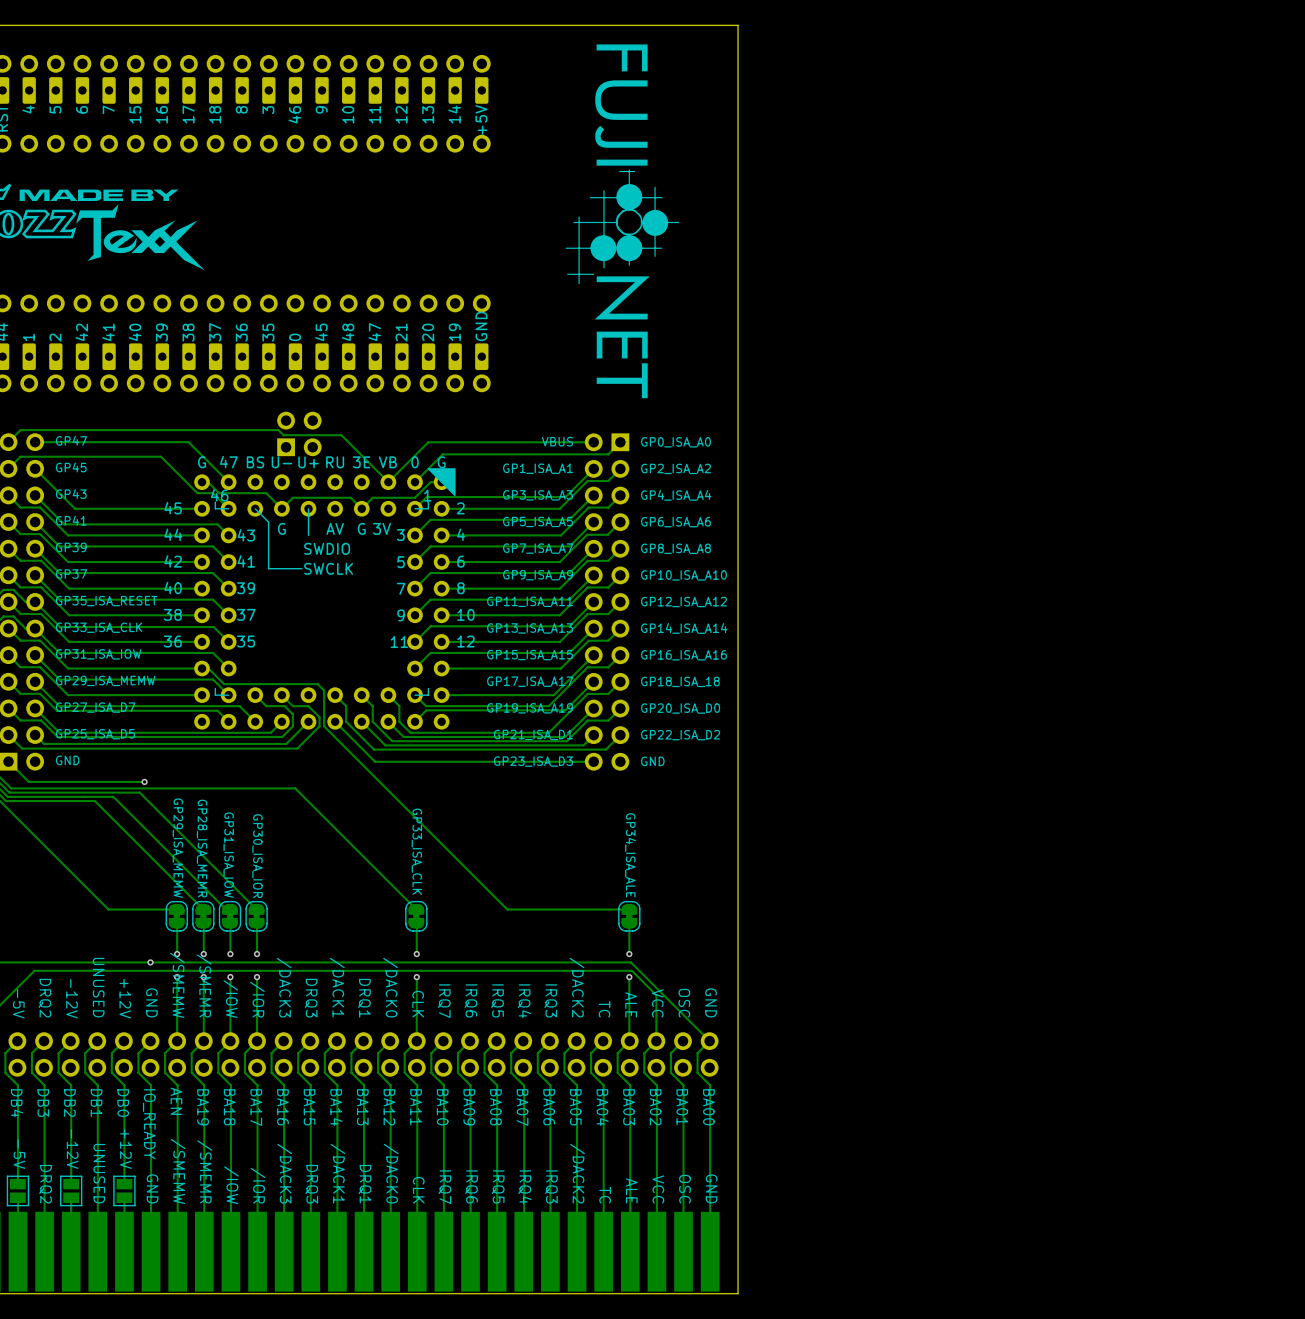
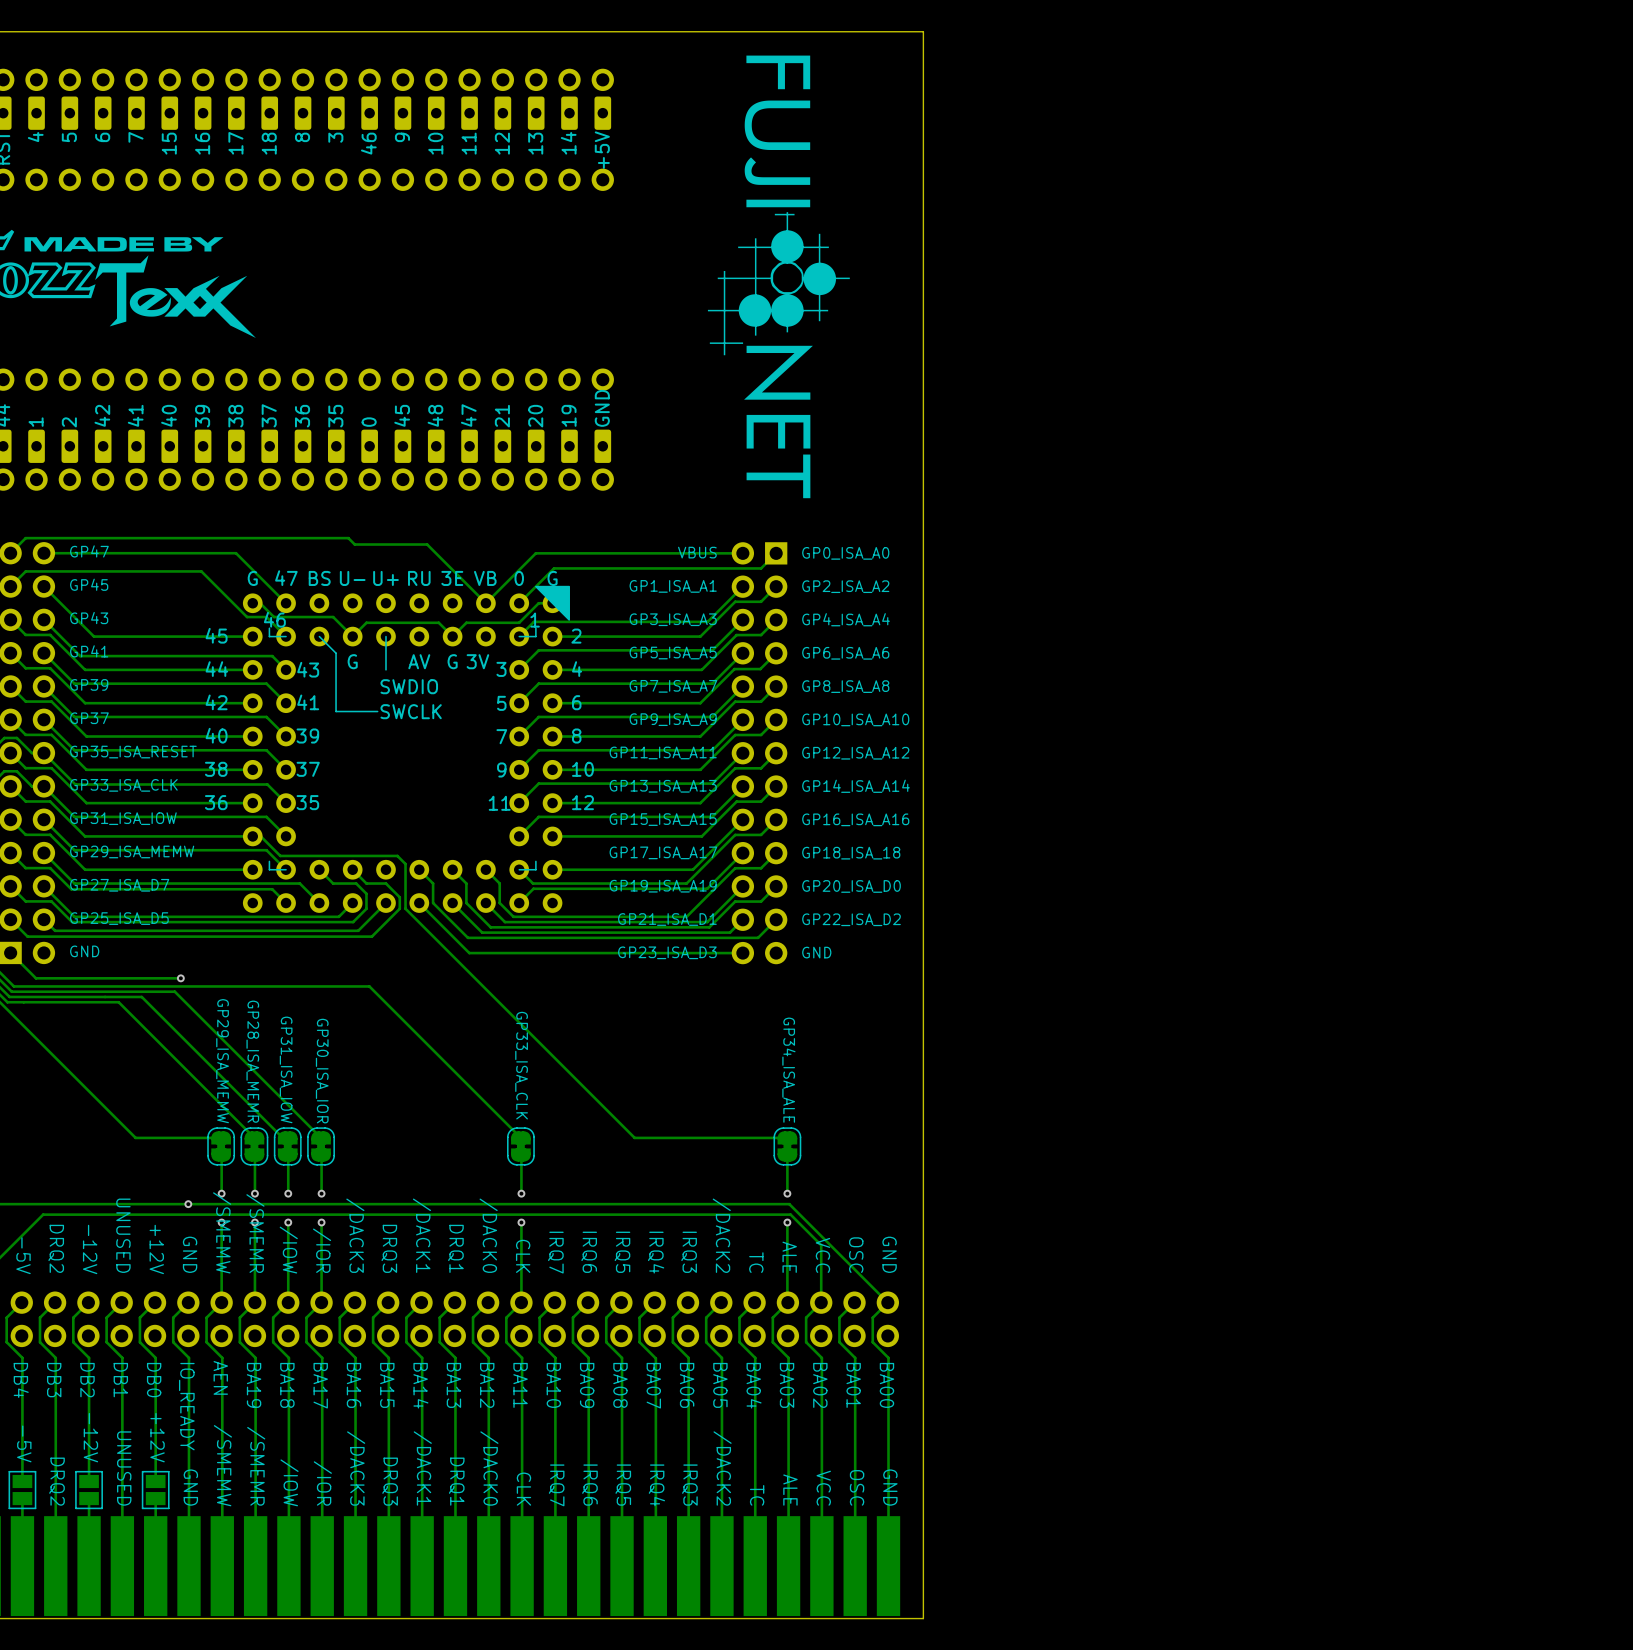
part: (299, 433) -> none

